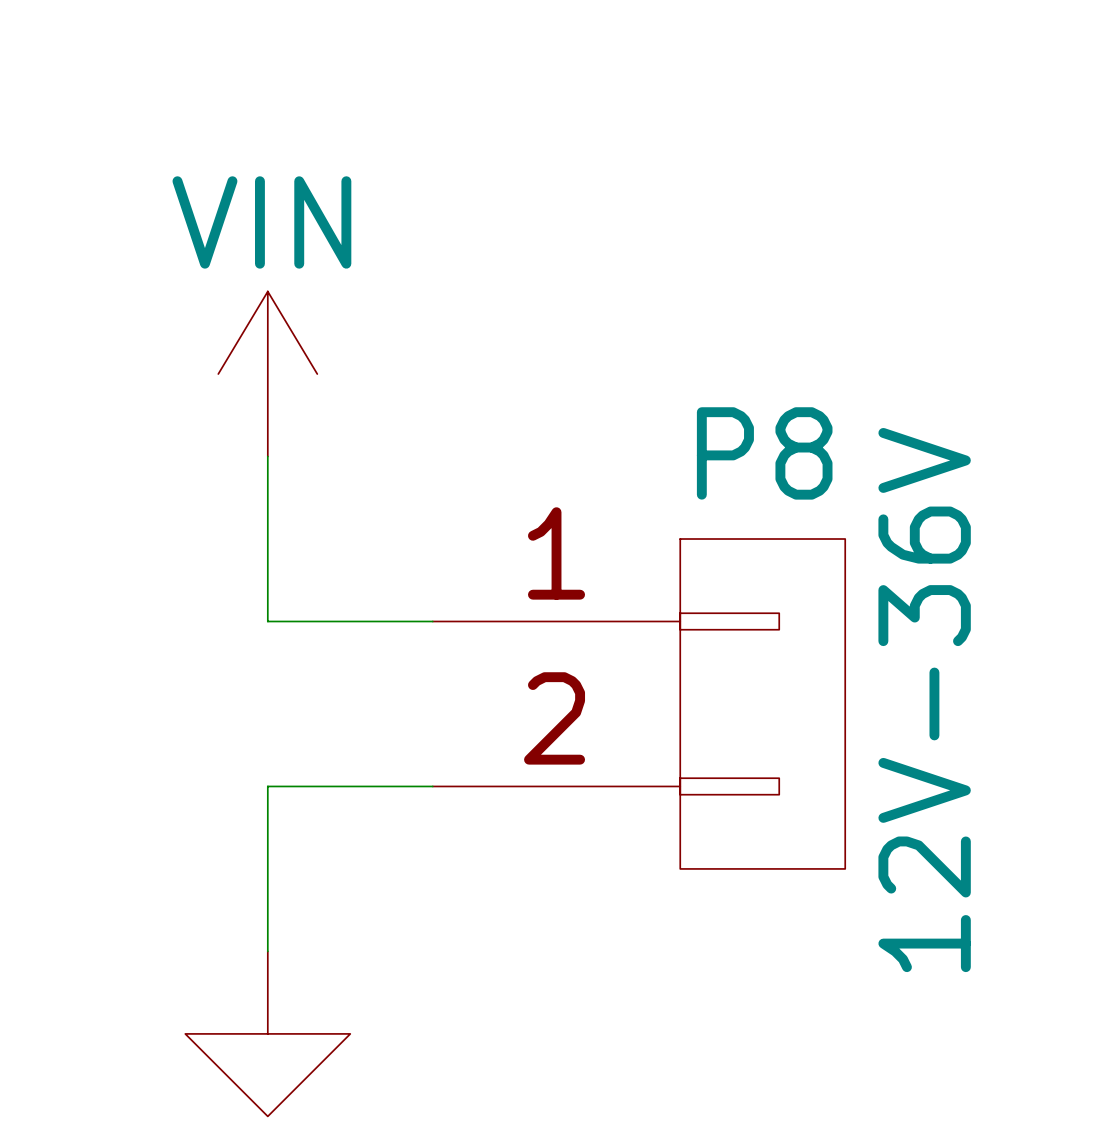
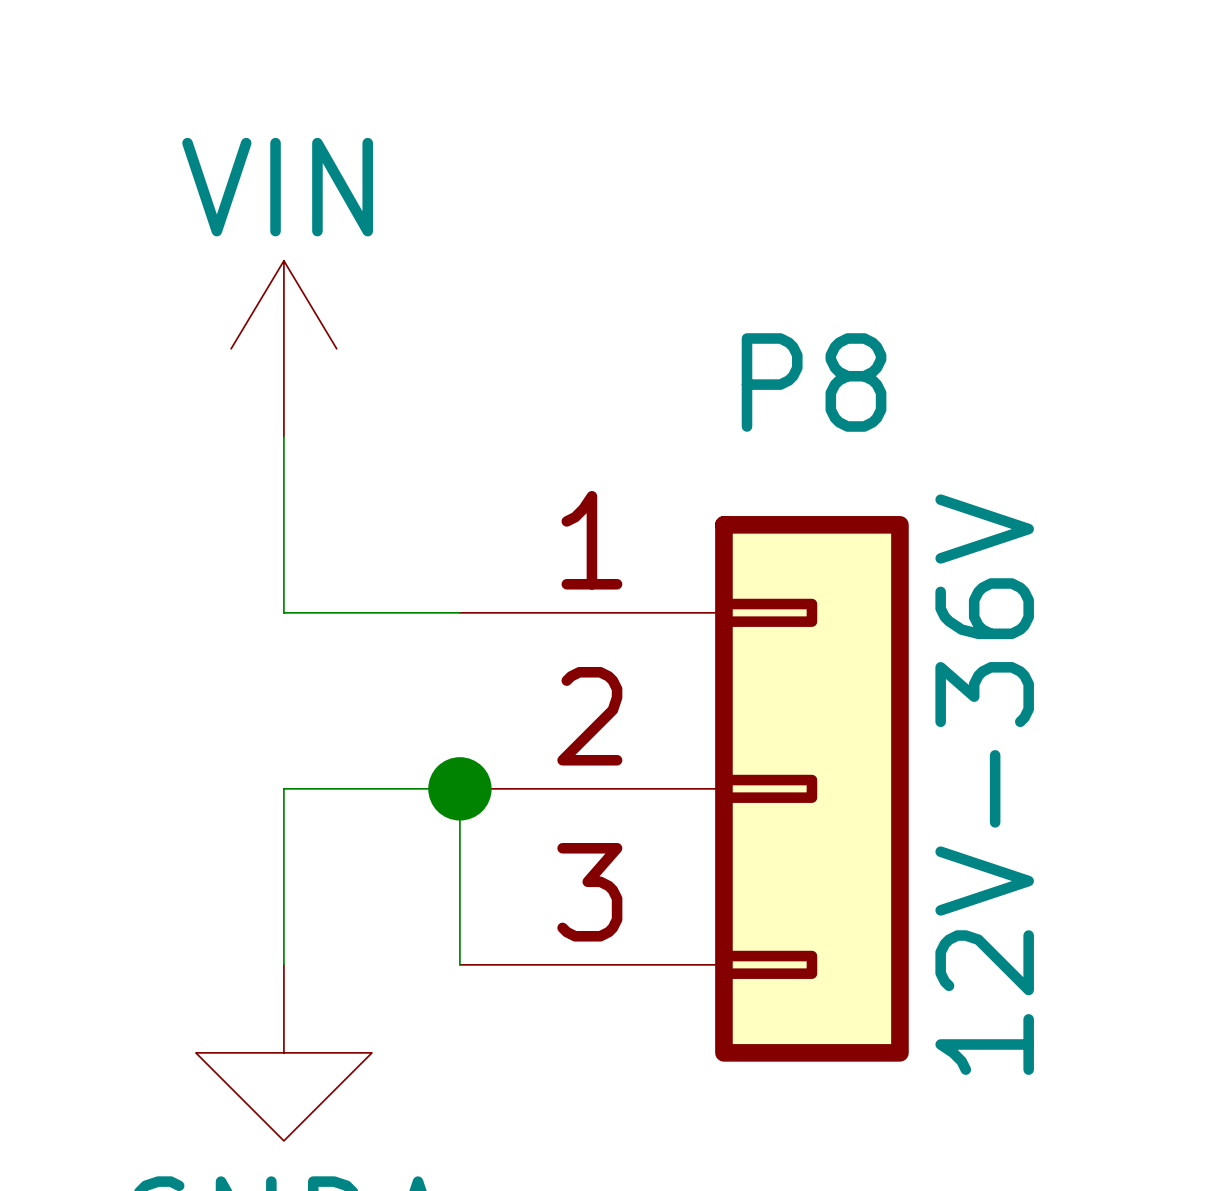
P8 name position: P8 (764, 453) -> P8 (814, 382)
P8 symbol: [432, 539, 846, 869] -> [459, 516, 909, 1062]
wire: none -> (459, 788) (459, 964)
junction: none -> (459, 788)

